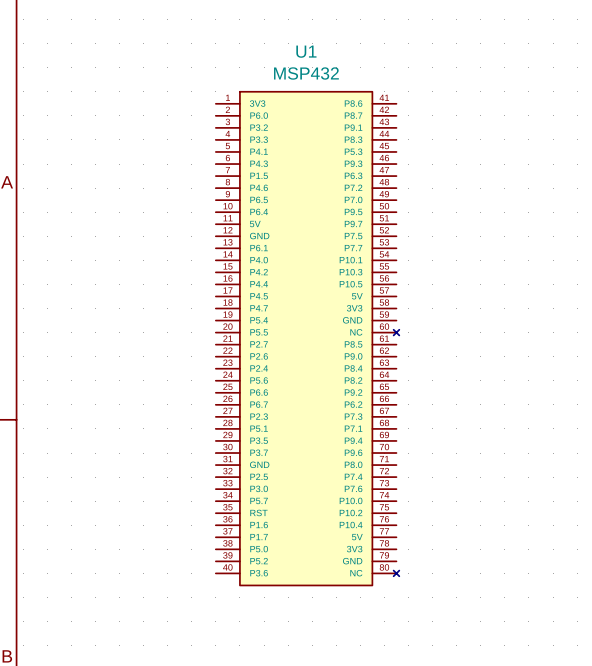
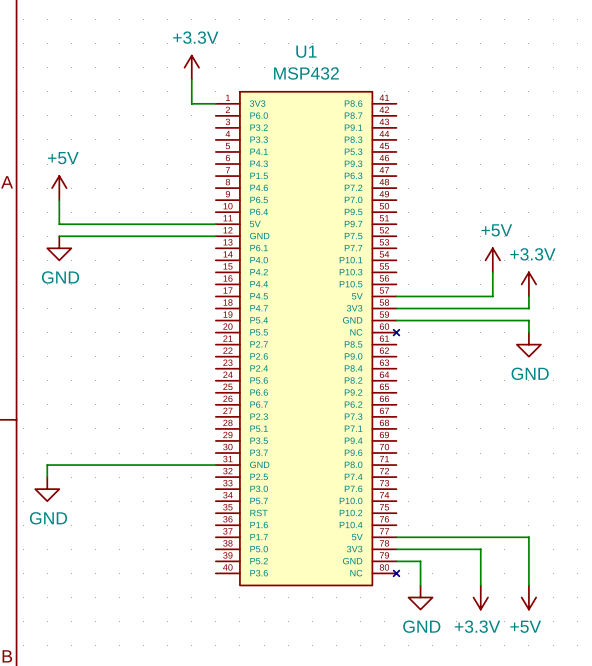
power symbol: none -> +3.3V (191, 67)
wire: none -> (191, 79) (191, 103) (215, 103)
power symbol: none -> +5V (59, 188)
wire: none -> (59, 200) (59, 224) (215, 224)
wire: none -> (59, 236) (215, 236)
power symbol: none -> GND (59, 248)
power symbol: none -> +5V (492, 260)
wire: none -> (492, 272) (492, 296) (396, 296)
power symbol: none -> +3.3V (528, 284)
wire: none -> (528, 296) (528, 308) (396, 308)
wire: none -> (396, 320) (528, 320) (528, 332)
power symbol: none -> GND (528, 344)
wire: none -> (215, 465) (47, 465) (47, 477)
power symbol: none -> GND (47, 489)
wire: none -> (396, 537) (528, 537) (528, 585)
wire: none -> (396, 549) (480, 549) (480, 585)
wire: none -> (396, 561) (420, 561) (420, 585)
power symbol: none -> GND (420, 597)
power symbol: none -> +3.3V (480, 597)
power symbol: none -> +5V (528, 597)

